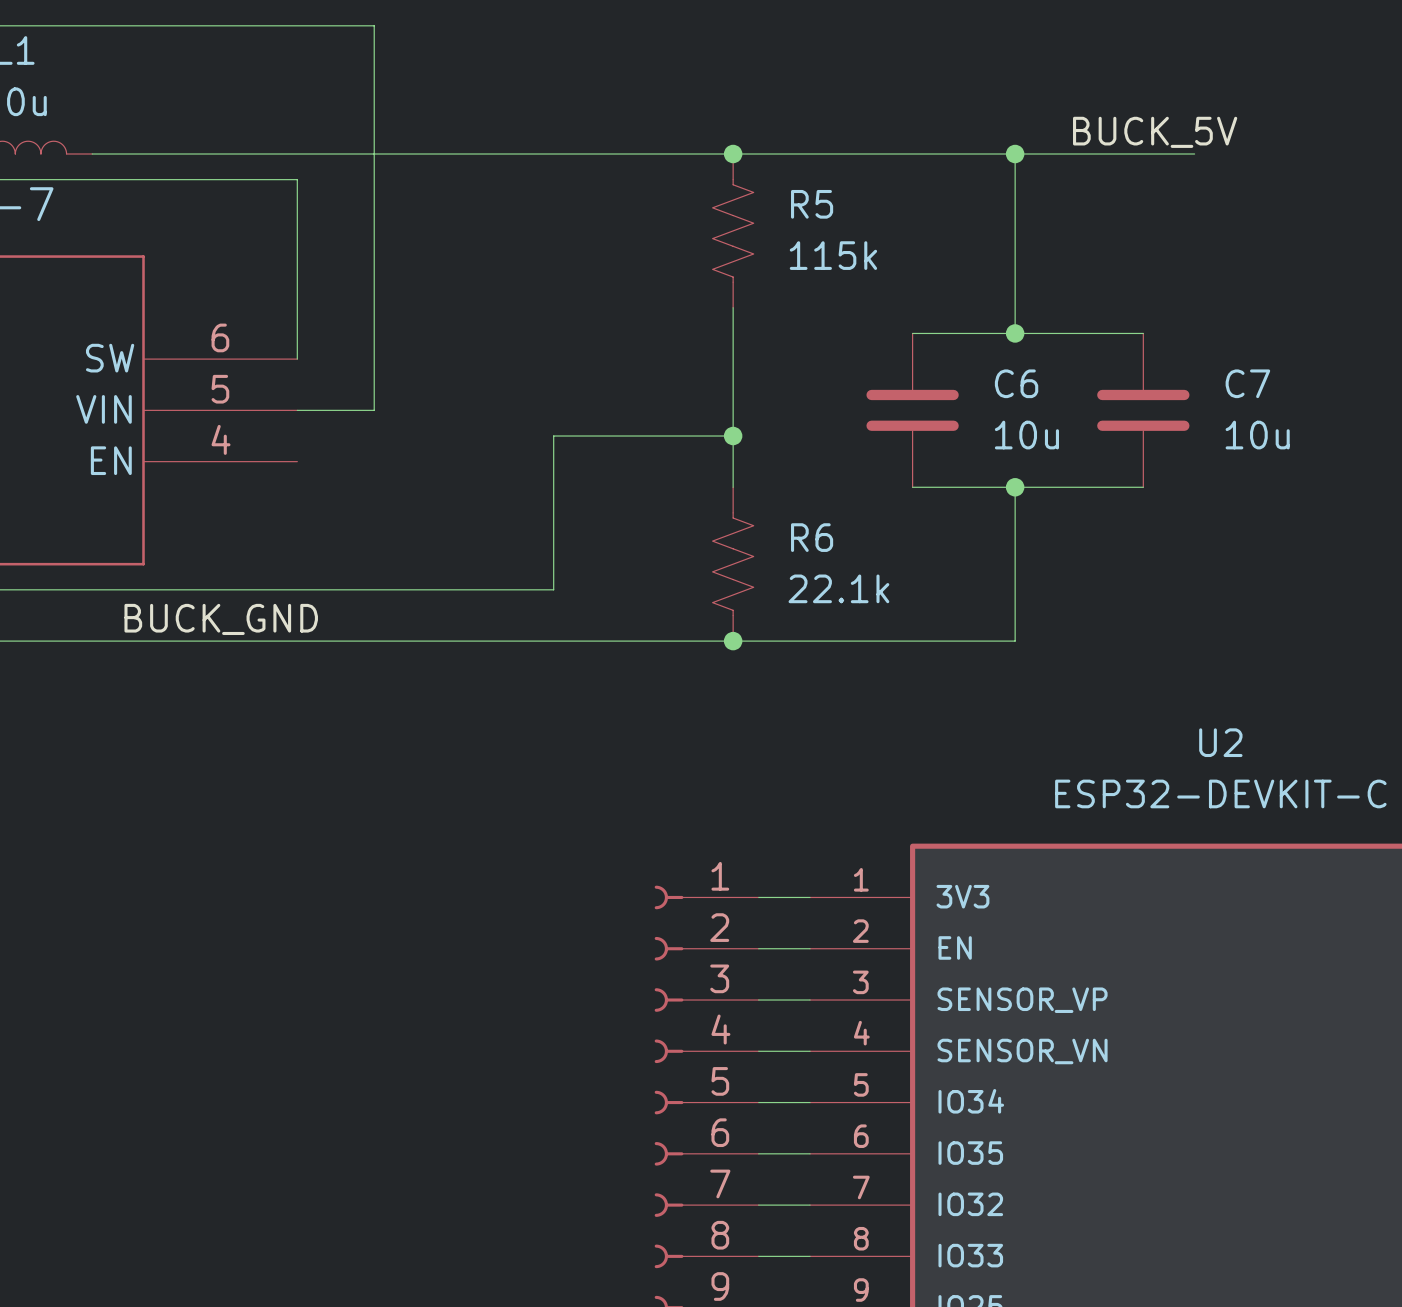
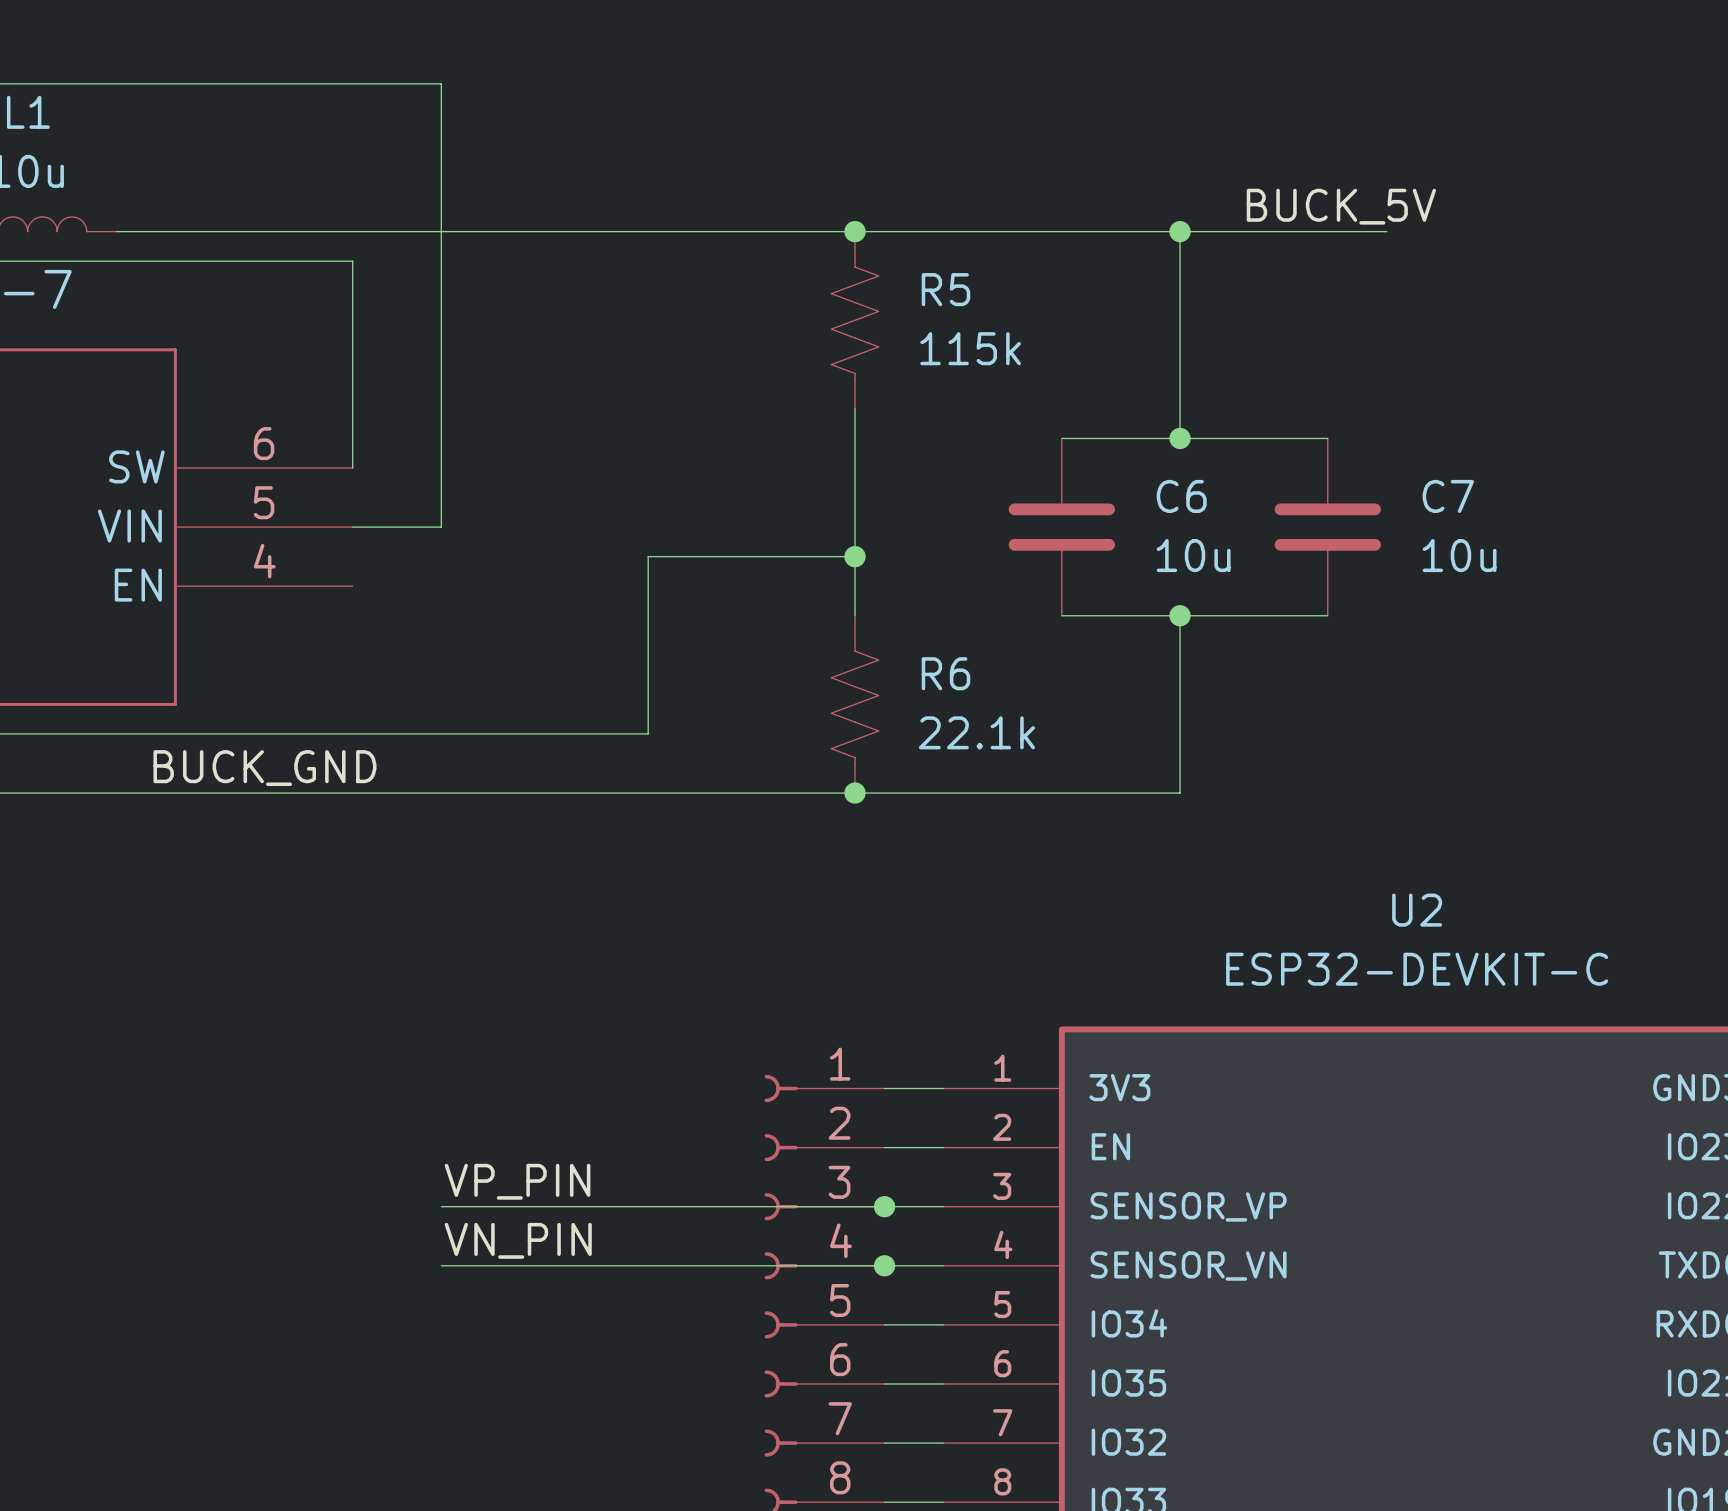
label: none -> VP_PIN (517, 1181)
wire: none -> (441, 1206) (884, 1206)
junction: none -> (884, 1206)
label: none -> VN_PIN (518, 1240)
wire: none -> (441, 1265) (884, 1265)
junction: none -> (884, 1265)

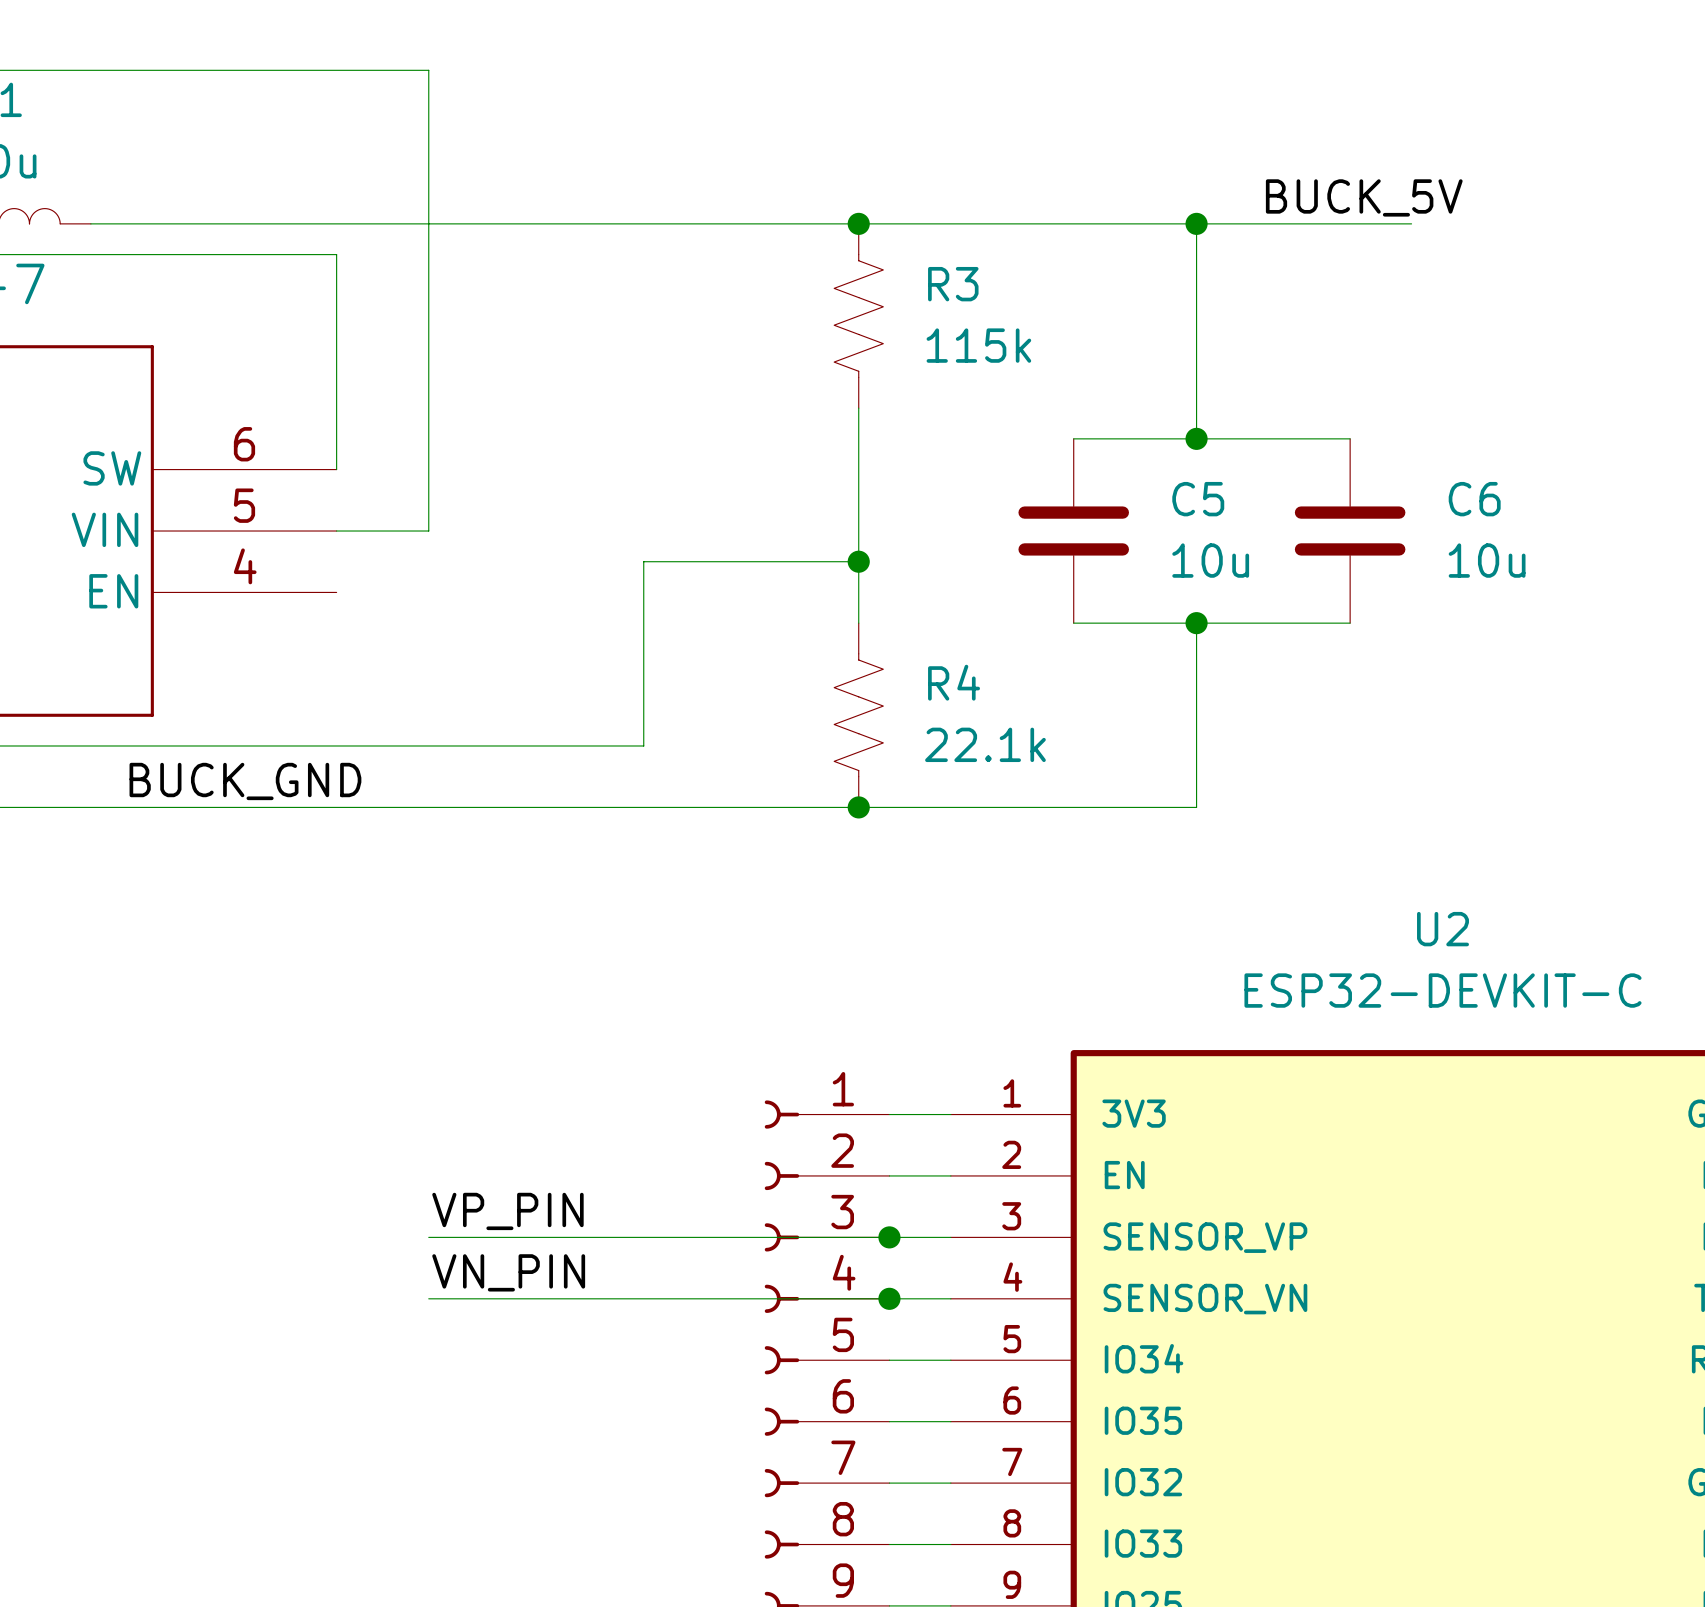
R5 name: R5 (945, 289) -> R3 (953, 284)
C6 name: C6 (1181, 496) -> C5 (1198, 499)
C7 name: C7 (1448, 496) -> C6 (1474, 499)
R6 name: R6 (945, 673) -> R4 (954, 682)

